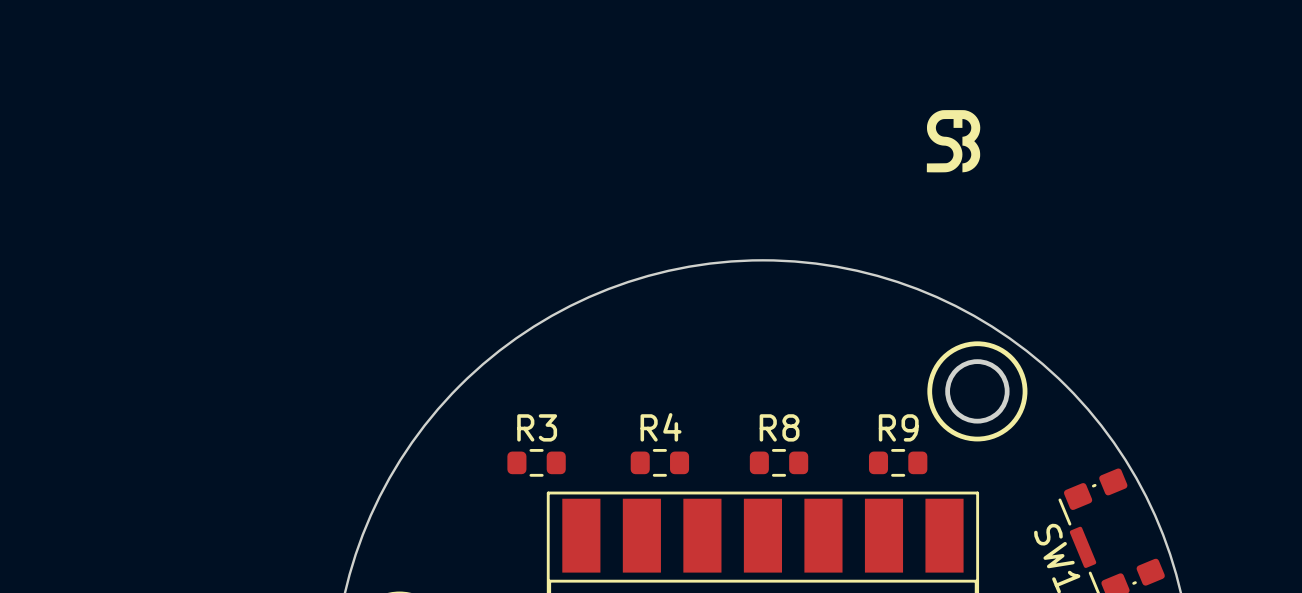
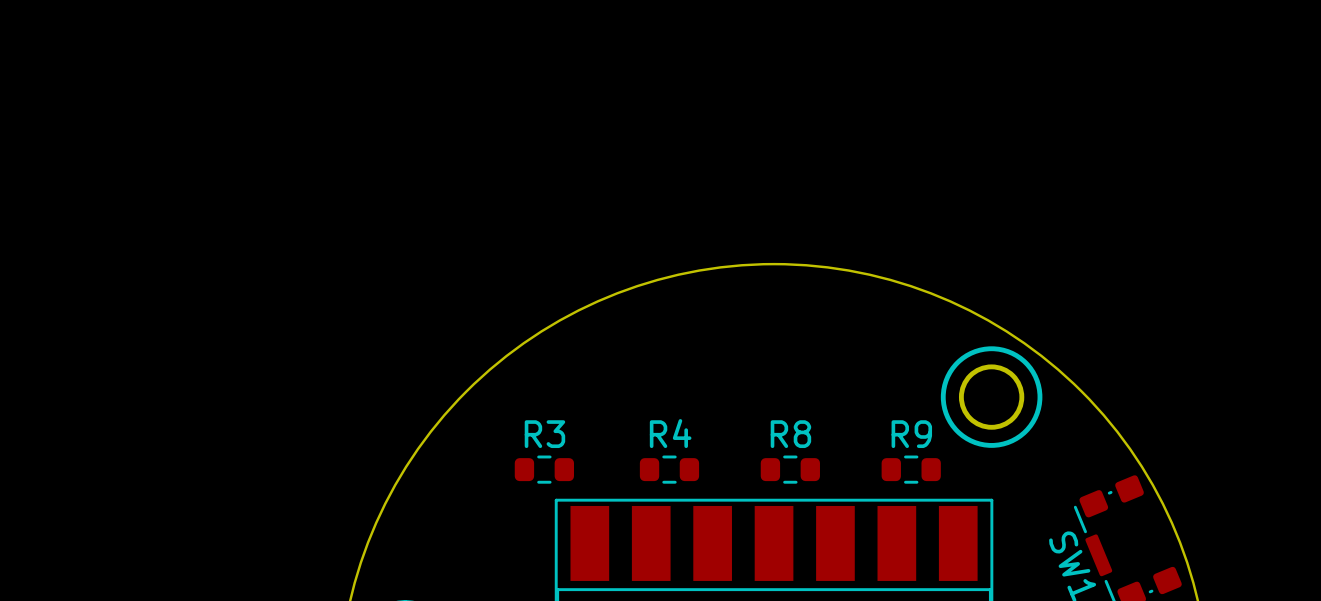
drawing: [926, 110, 981, 173] -> none

